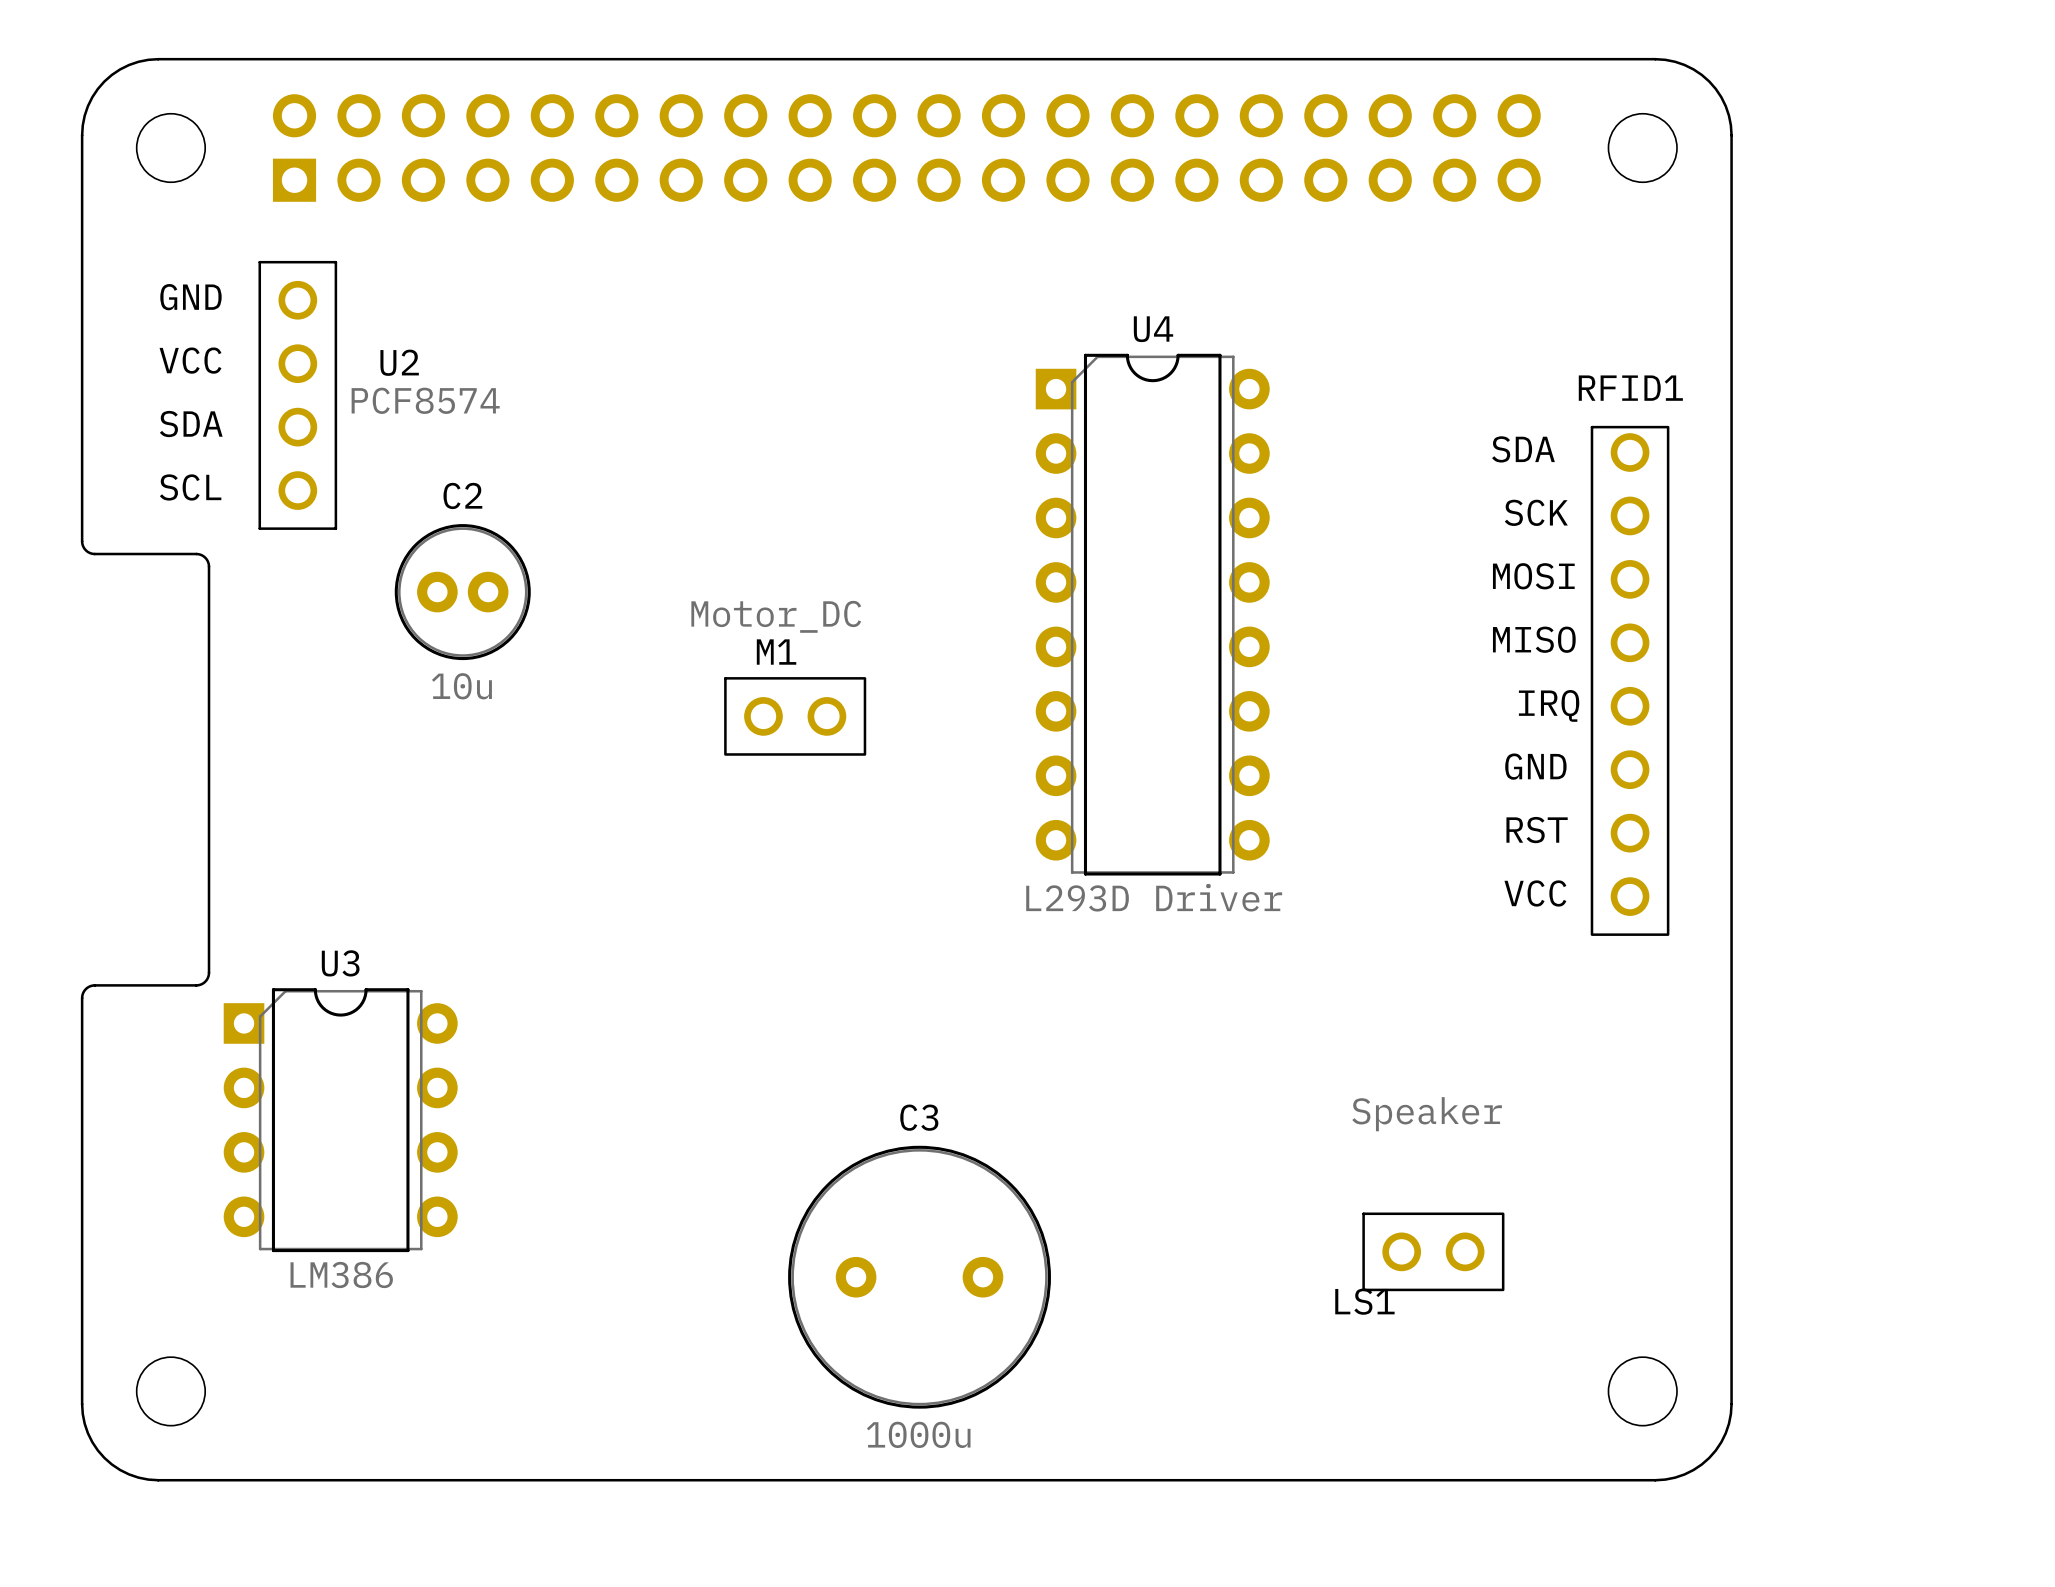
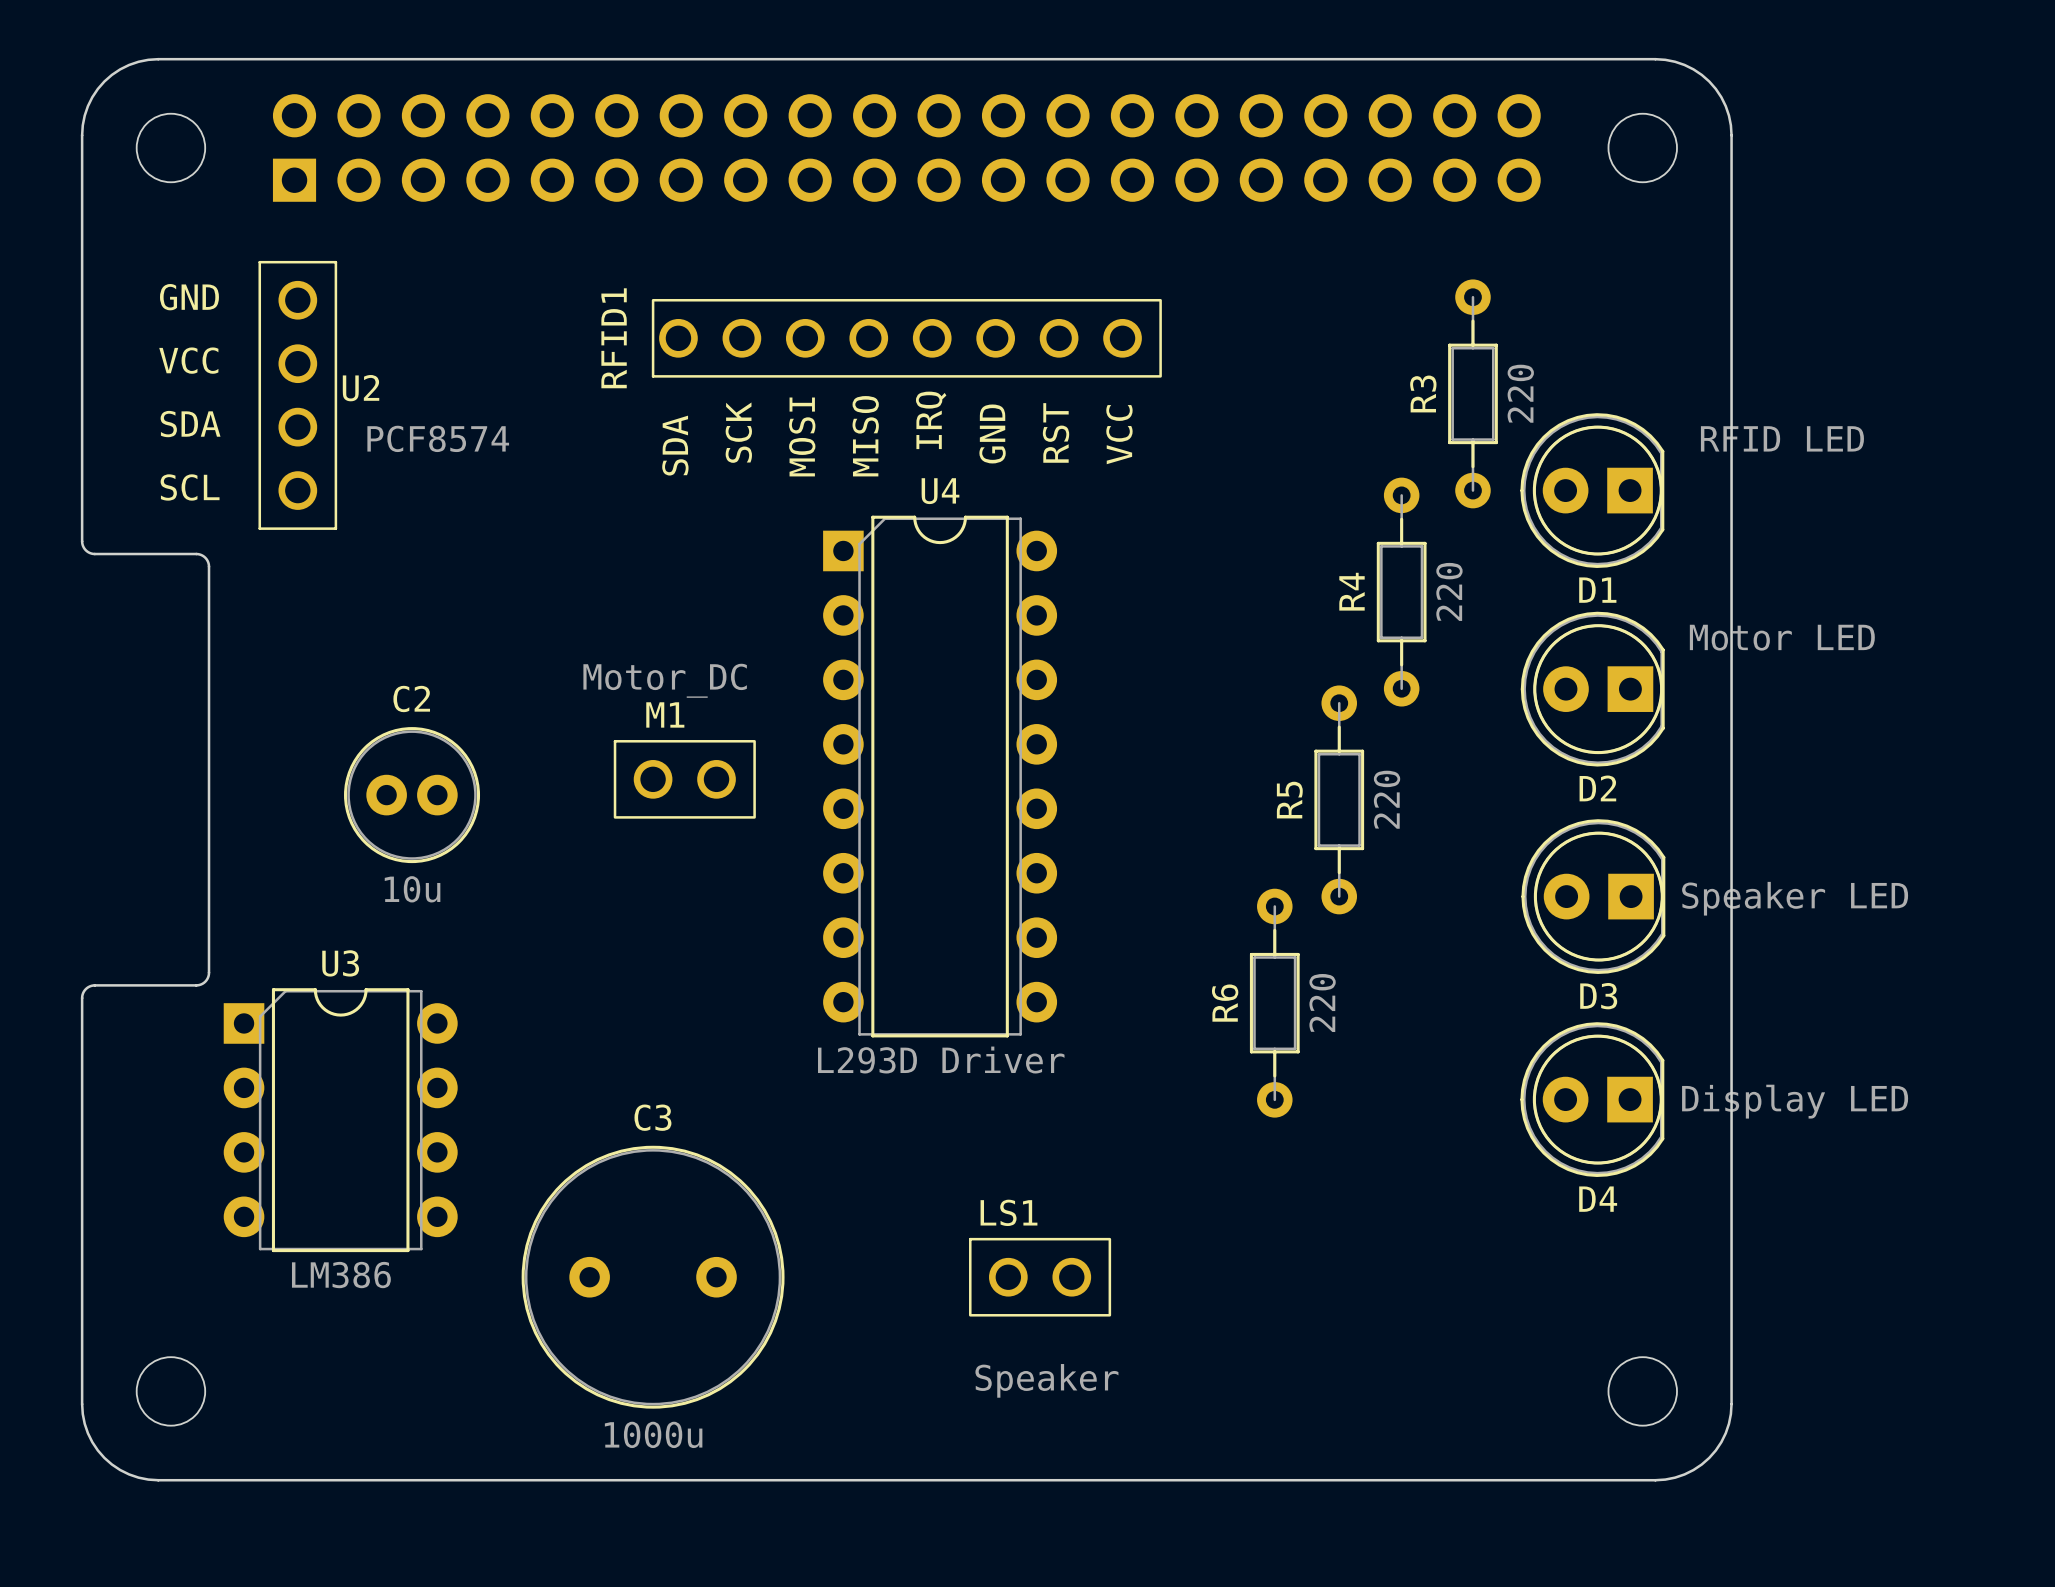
U2 name position: U2 (399, 362) -> U2 (361, 388)
R3: none -> 220 (1472, 393)
U2 value position: PCF8574 (425, 400) -> PCF8574 (438, 438)
D1: none -> RFID LED (1592, 490)
C2 position: (462, 592) -> (412, 795)
R4: none -> 220 (1401, 592)
U4 position: (1152, 614) -> (940, 776)
RFID1 rotation: 0° (1630, 680) -> 90° counterclockwise (906, 338)
RFID1 position: (1630, 680) -> (906, 338)
D2: none -> Motor LED (1592, 689)
M1 position: (795, 716) -> (684, 779)
R5: none -> 220 (1339, 799)
D3: none -> Speaker LED (1593, 896)
R6: none -> 220 (1274, 1003)
D4: none -> Display LED (1592, 1099)
LS1 value position: Speaker (1427, 1114) -> Speaker (1046, 1380)
LS1 position: (1433, 1251) -> (1040, 1277)
C3 position: (919, 1277) -> (653, 1277)
LS1 name position: LS1 (1364, 1301) -> LS1 (1008, 1212)

